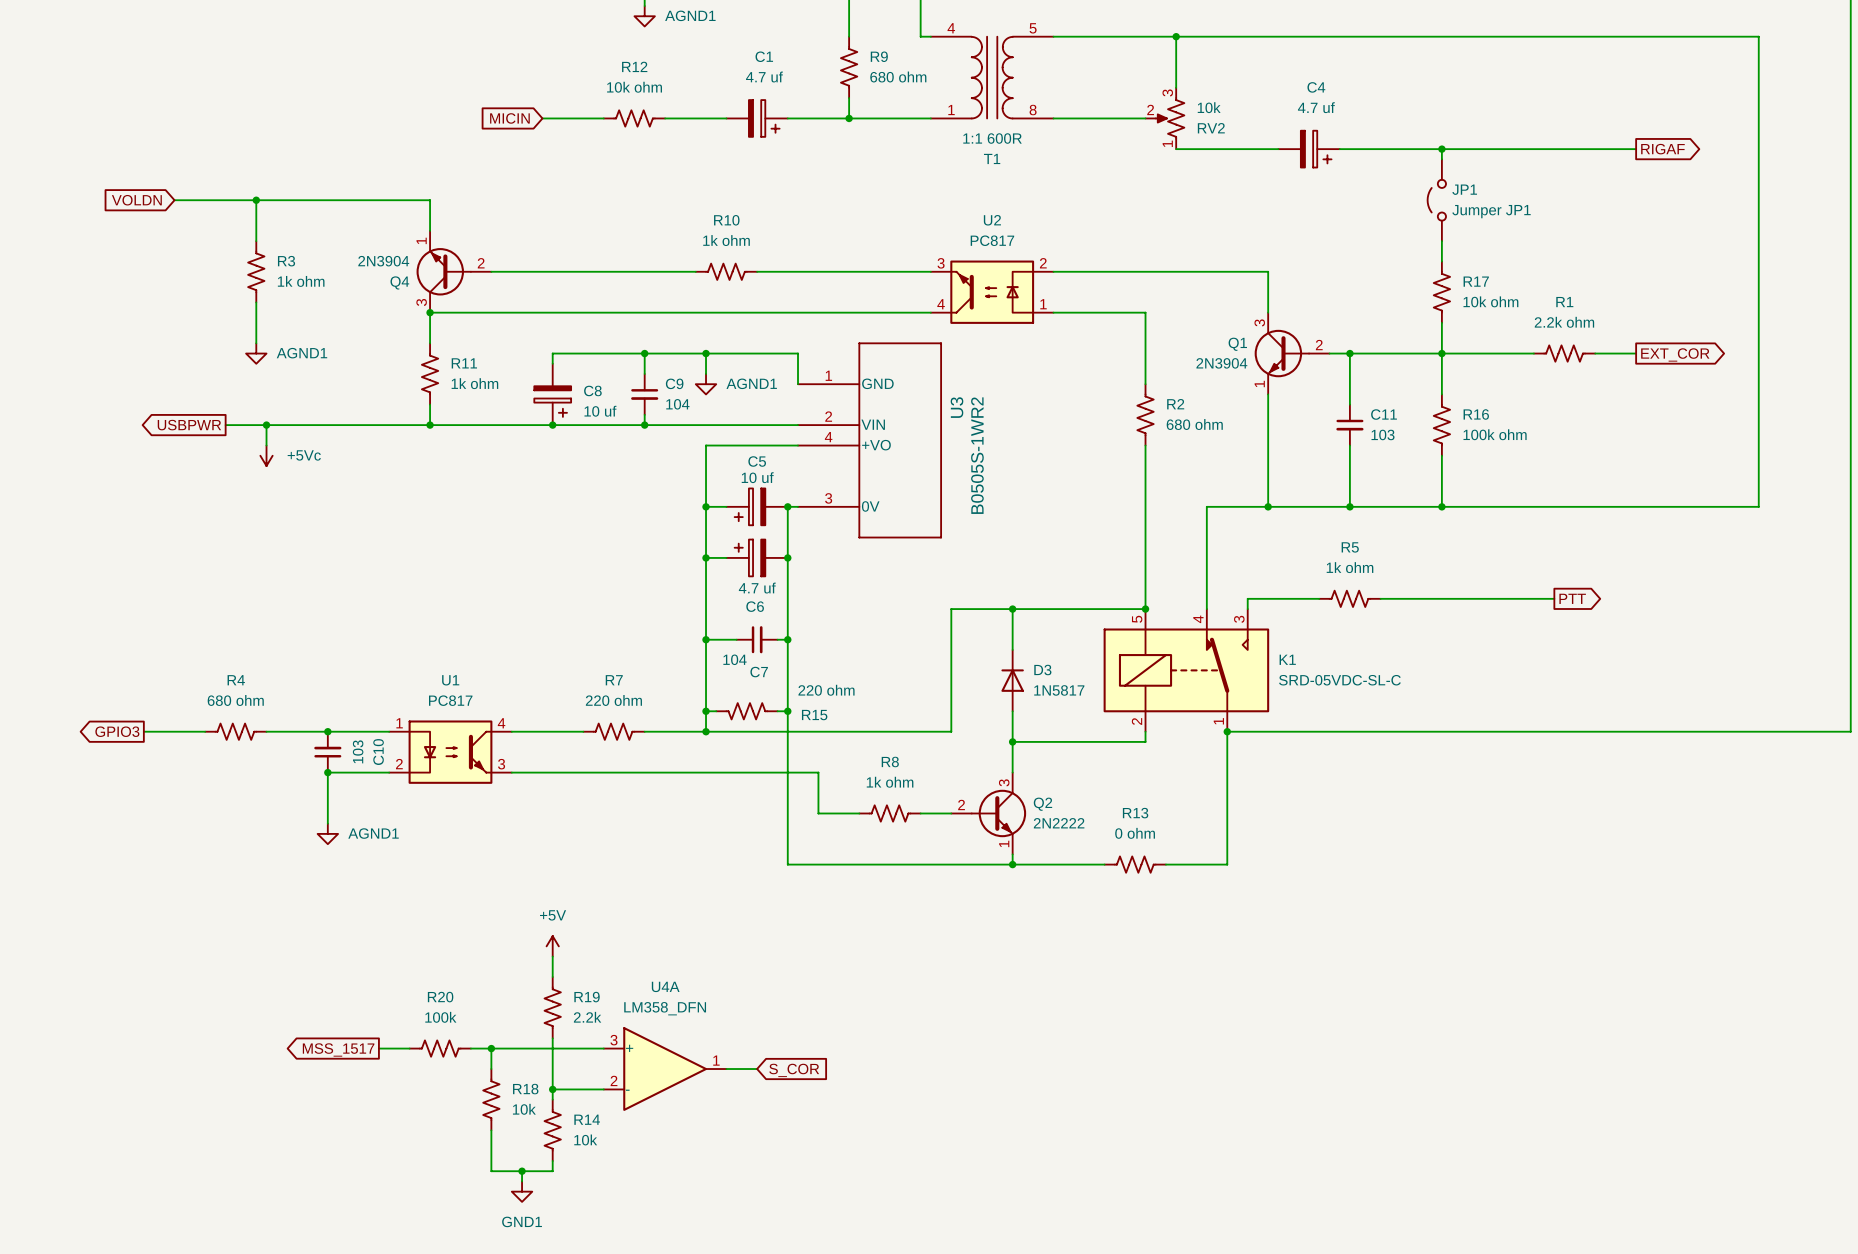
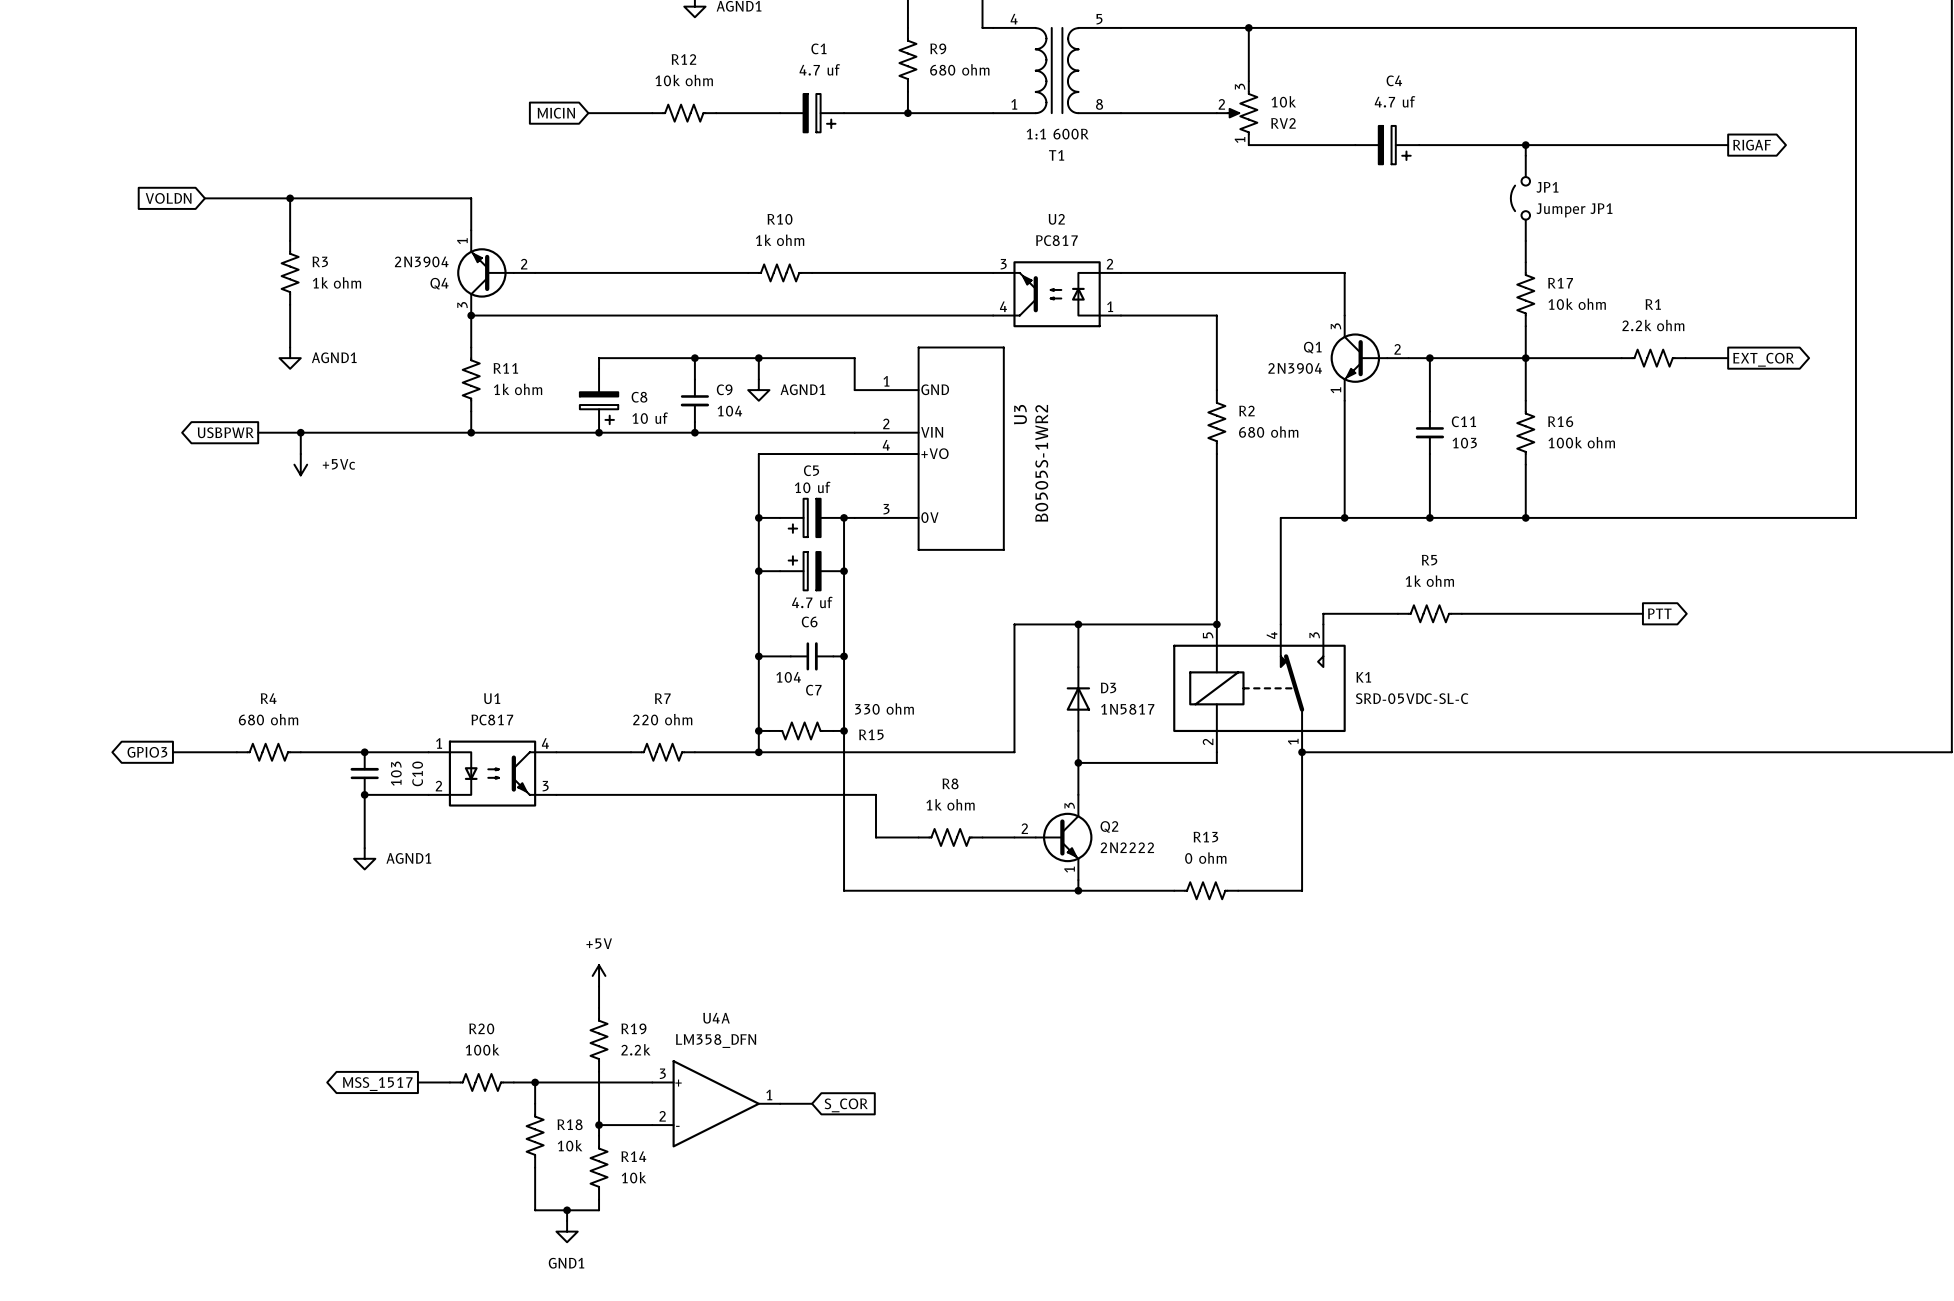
R15 value: 220 ohm (826, 690) -> 330 ohm (884, 708)

